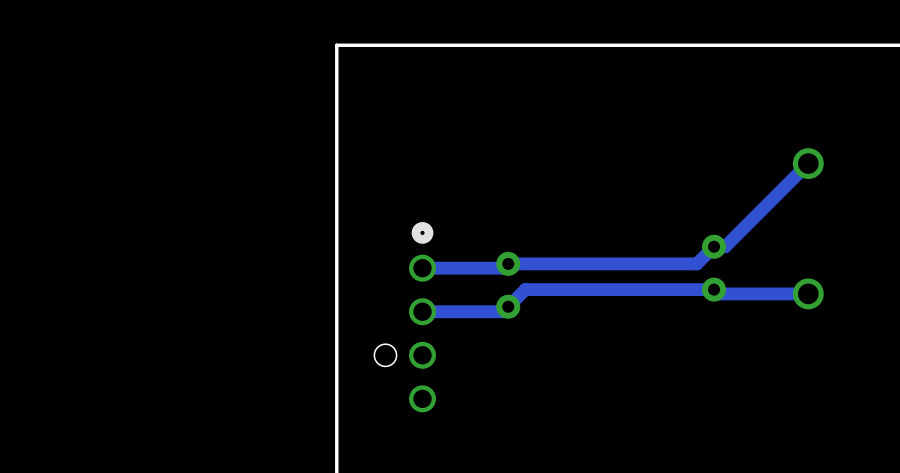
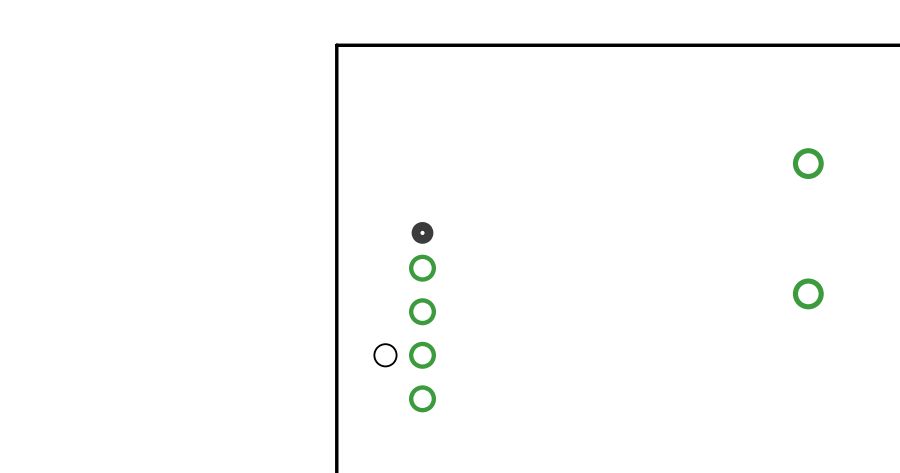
track: (808, 163) (725, 246) (714, 246) (696, 263) (508, 263) (503, 268) (422, 268) -> none
part: (714, 268) -> none
part: (508, 285) -> none
track: (808, 293) (718, 293) (714, 289) (525, 289) (503, 311) (422, 311) -> none

